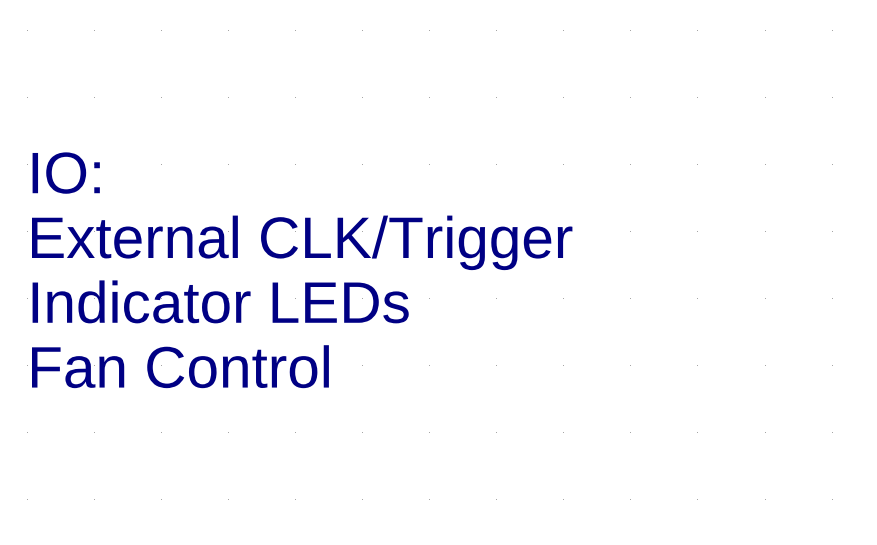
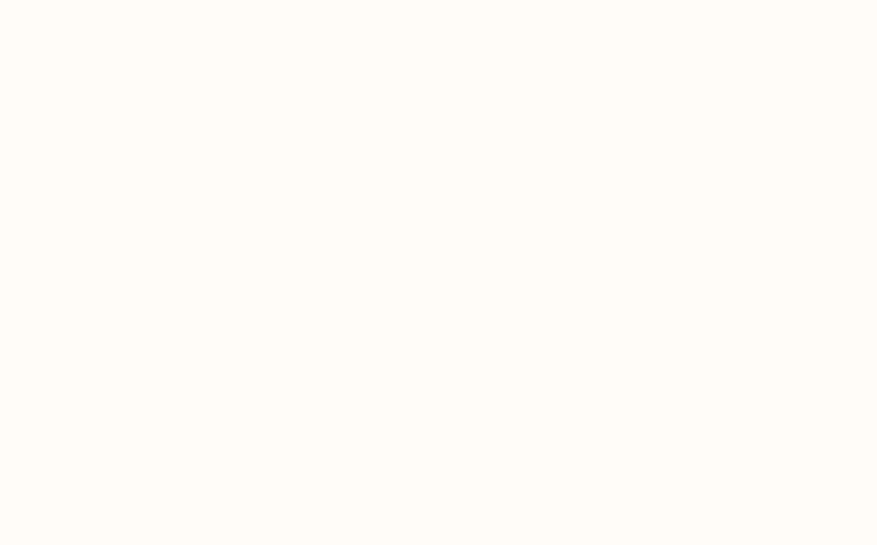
text: IO: (66, 173) -> none
text: External CLK/Trigger (302, 242) -> none
text: Indicator LEDs (220, 301) -> none
text: Fan Control (180, 366) -> none

